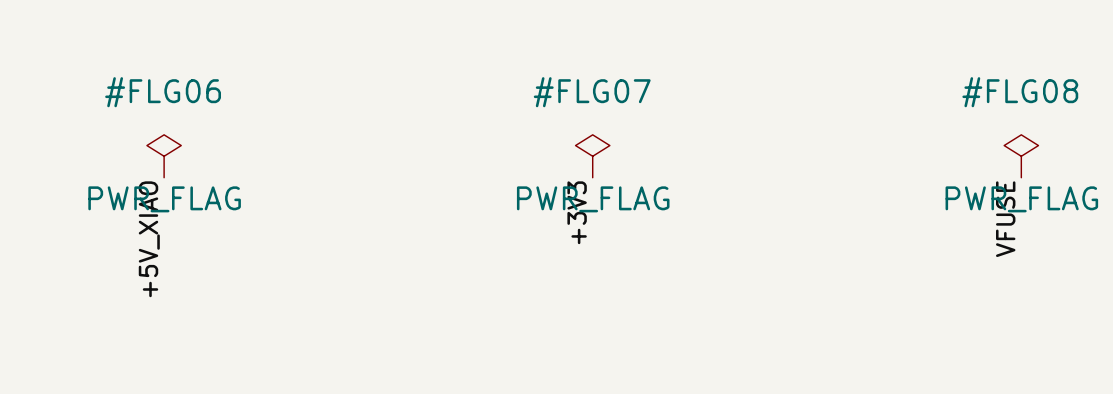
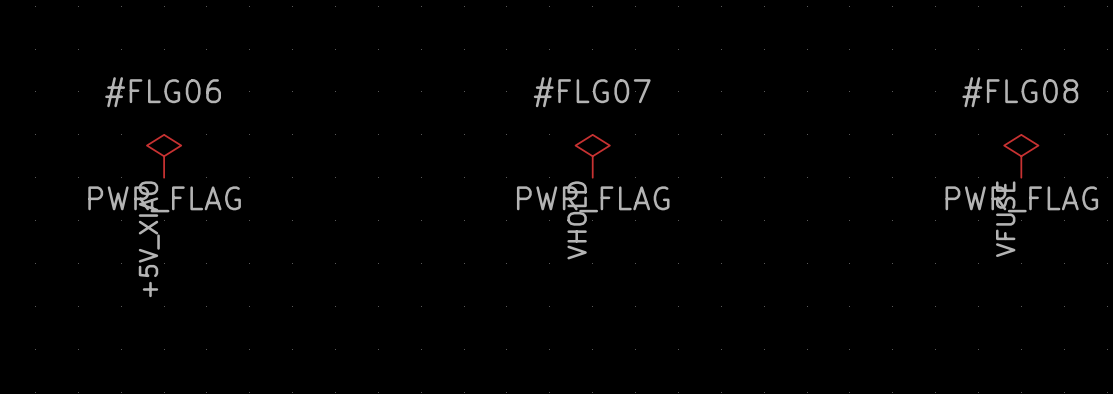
label: +3V3 (577, 212) -> VHOLD (577, 220)

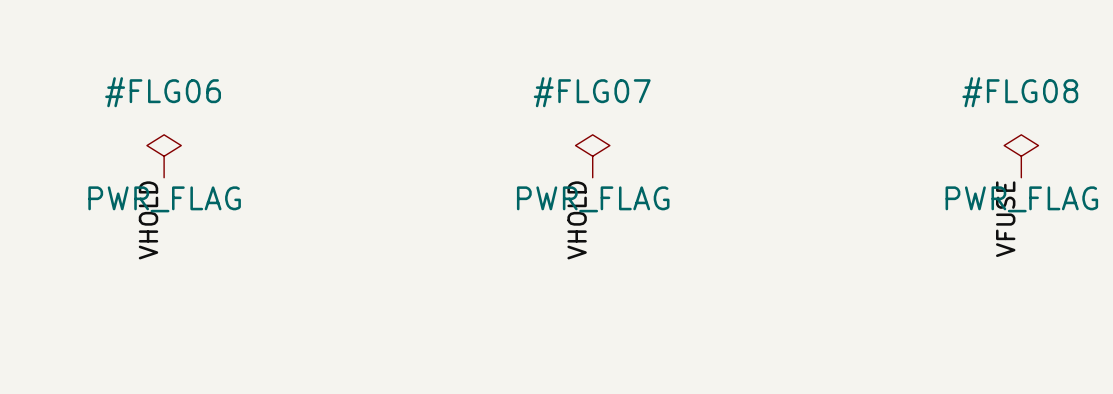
label: +5V_XIAO (149, 239) -> VHOLD (148, 220)

